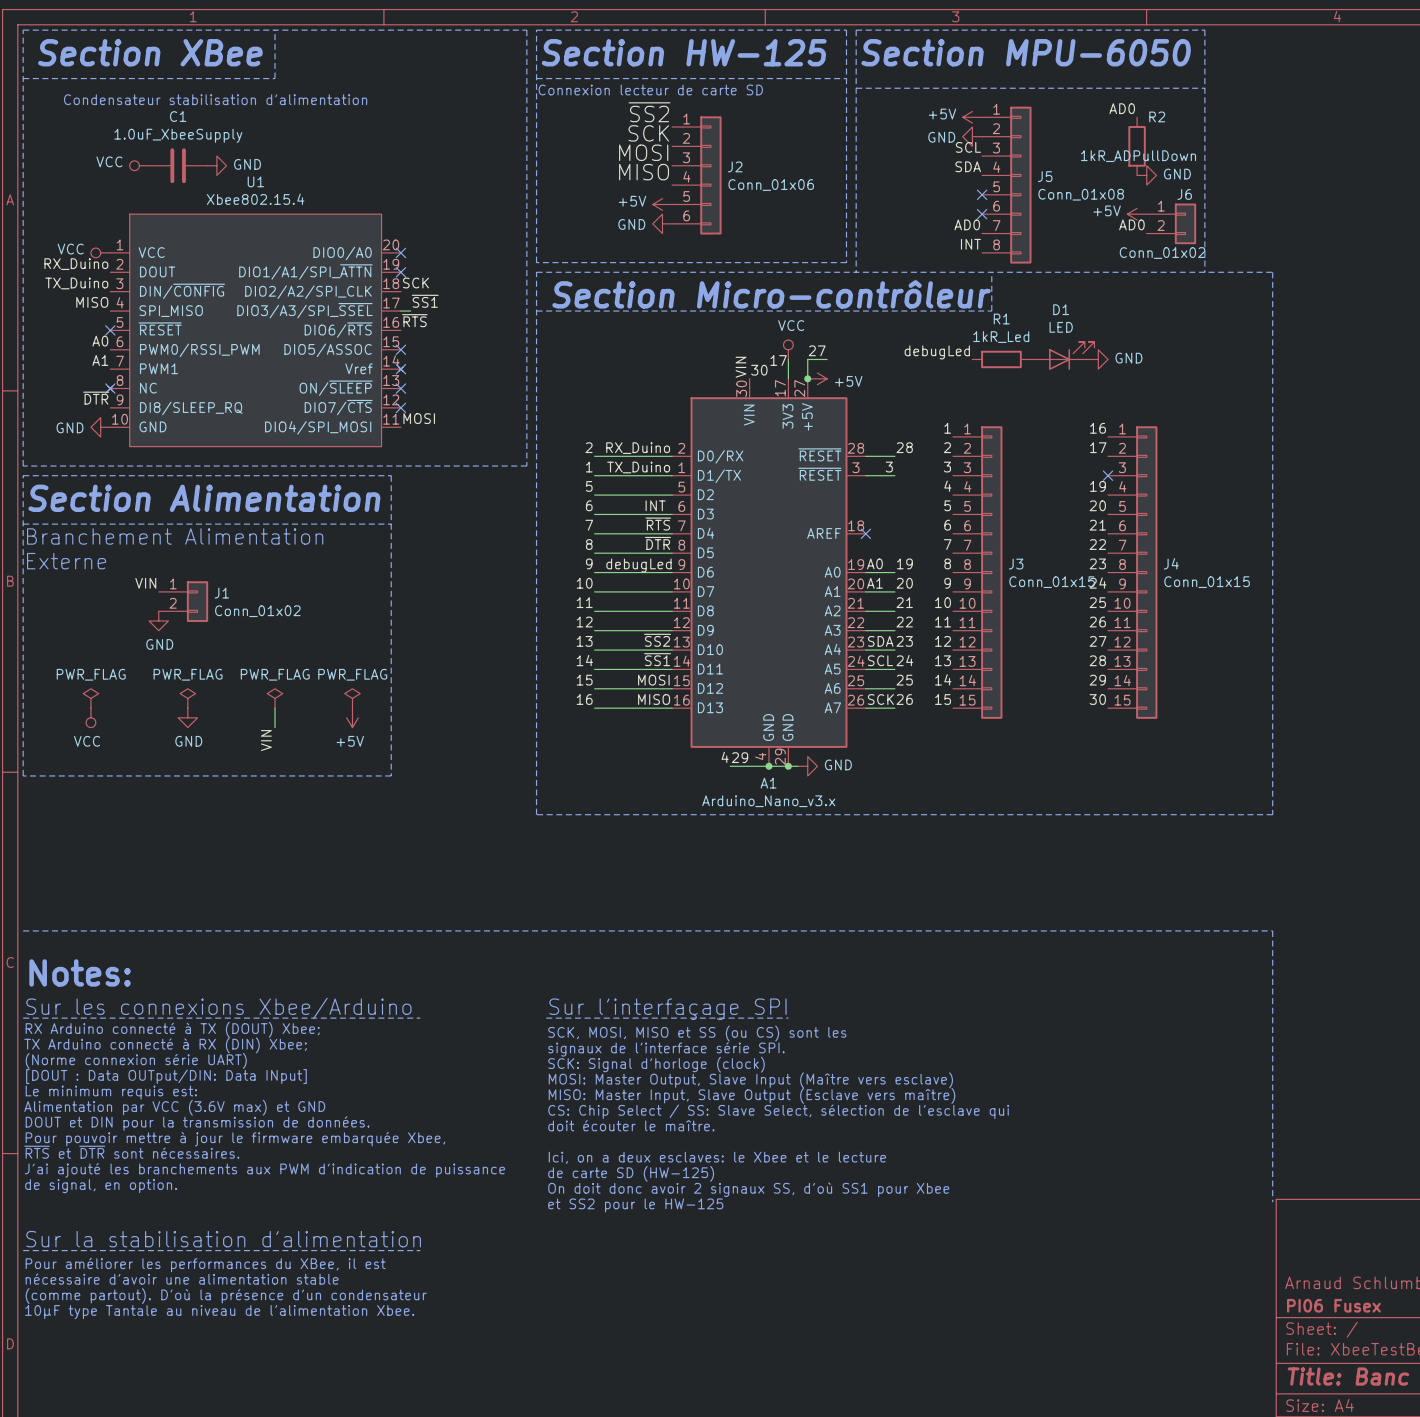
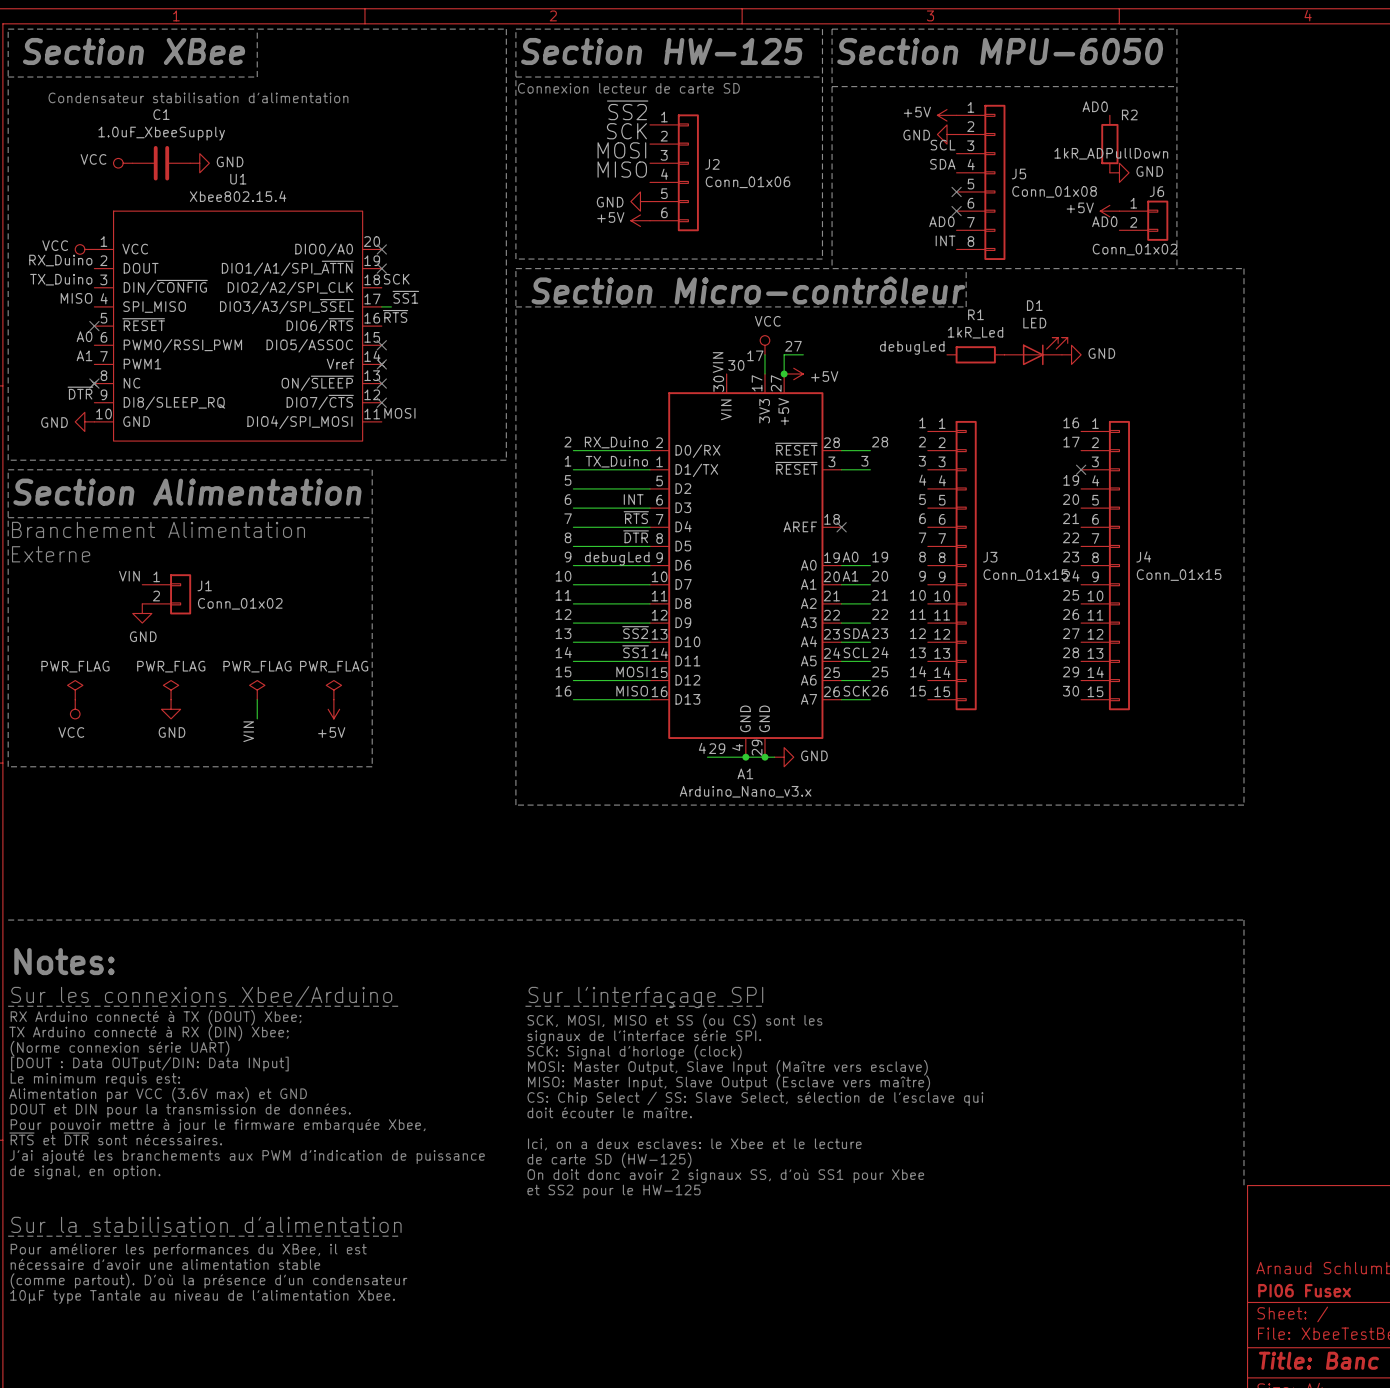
power symbol: +5V (662, 204) -> GND (640, 201)
power symbol: GND (662, 223) -> +5V (640, 220)

